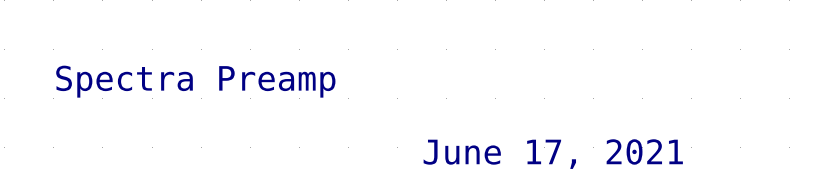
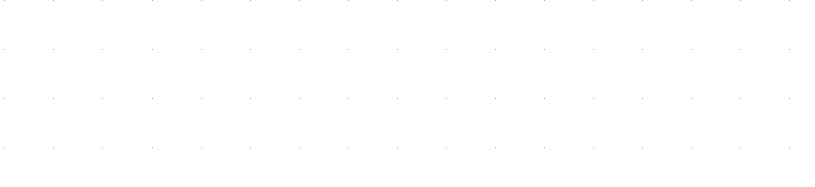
text: Spectra Preamp (195, 81) -> none
text: June 17, 2021 (553, 154) -> none

